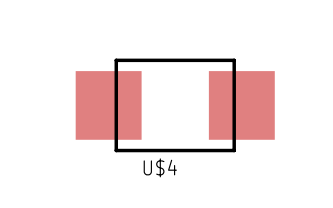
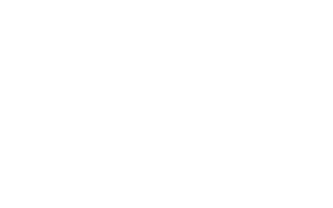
U$4: (175, 105) -> none

